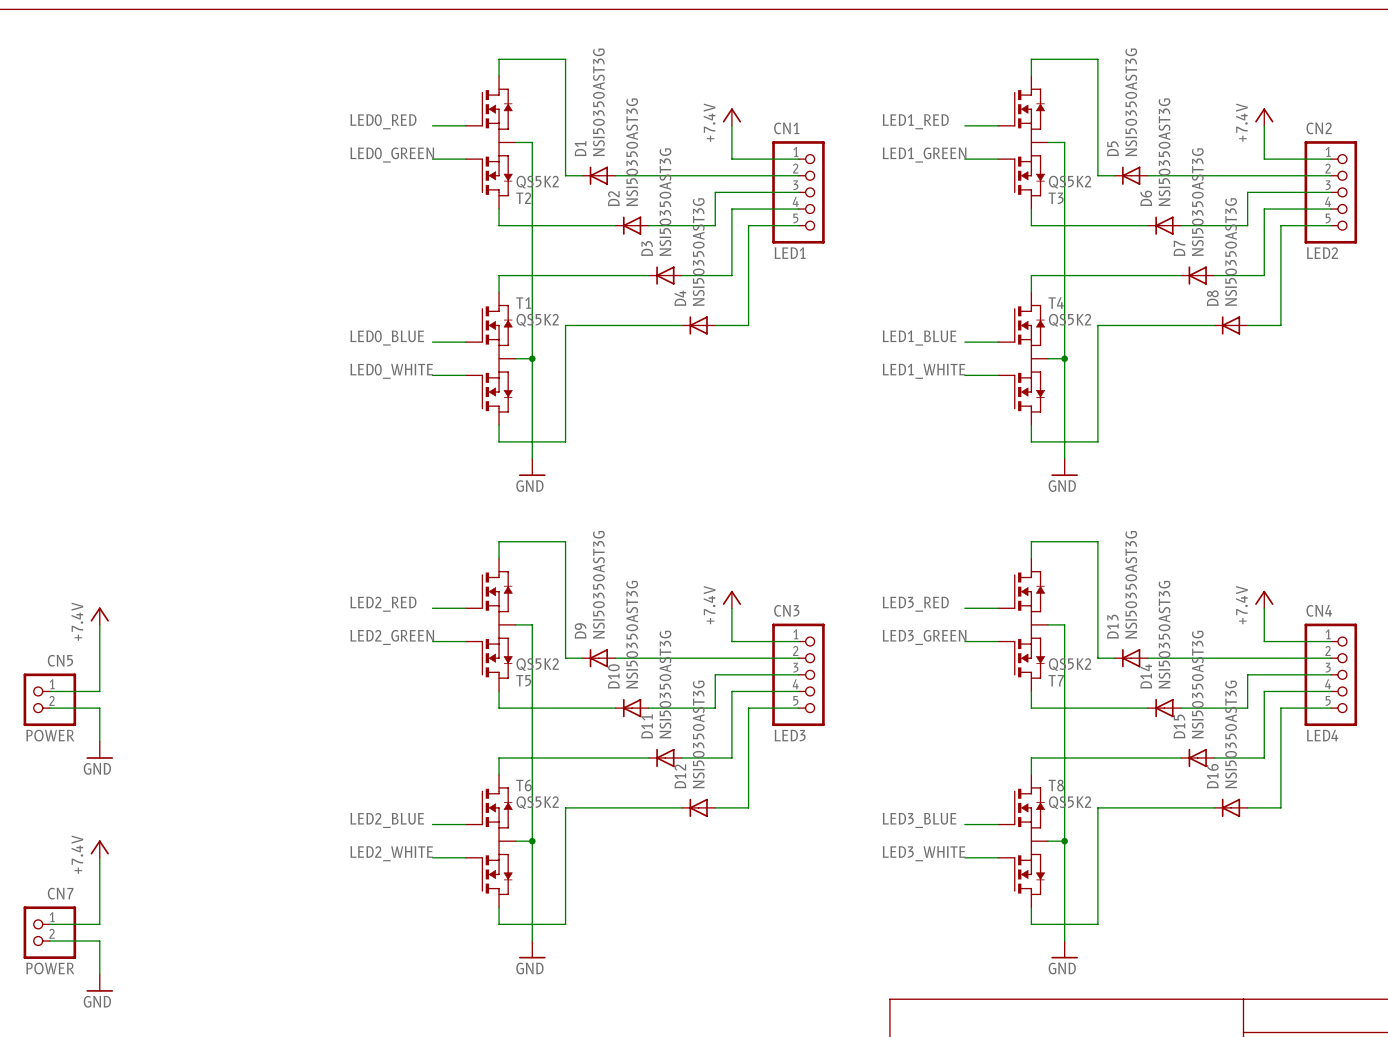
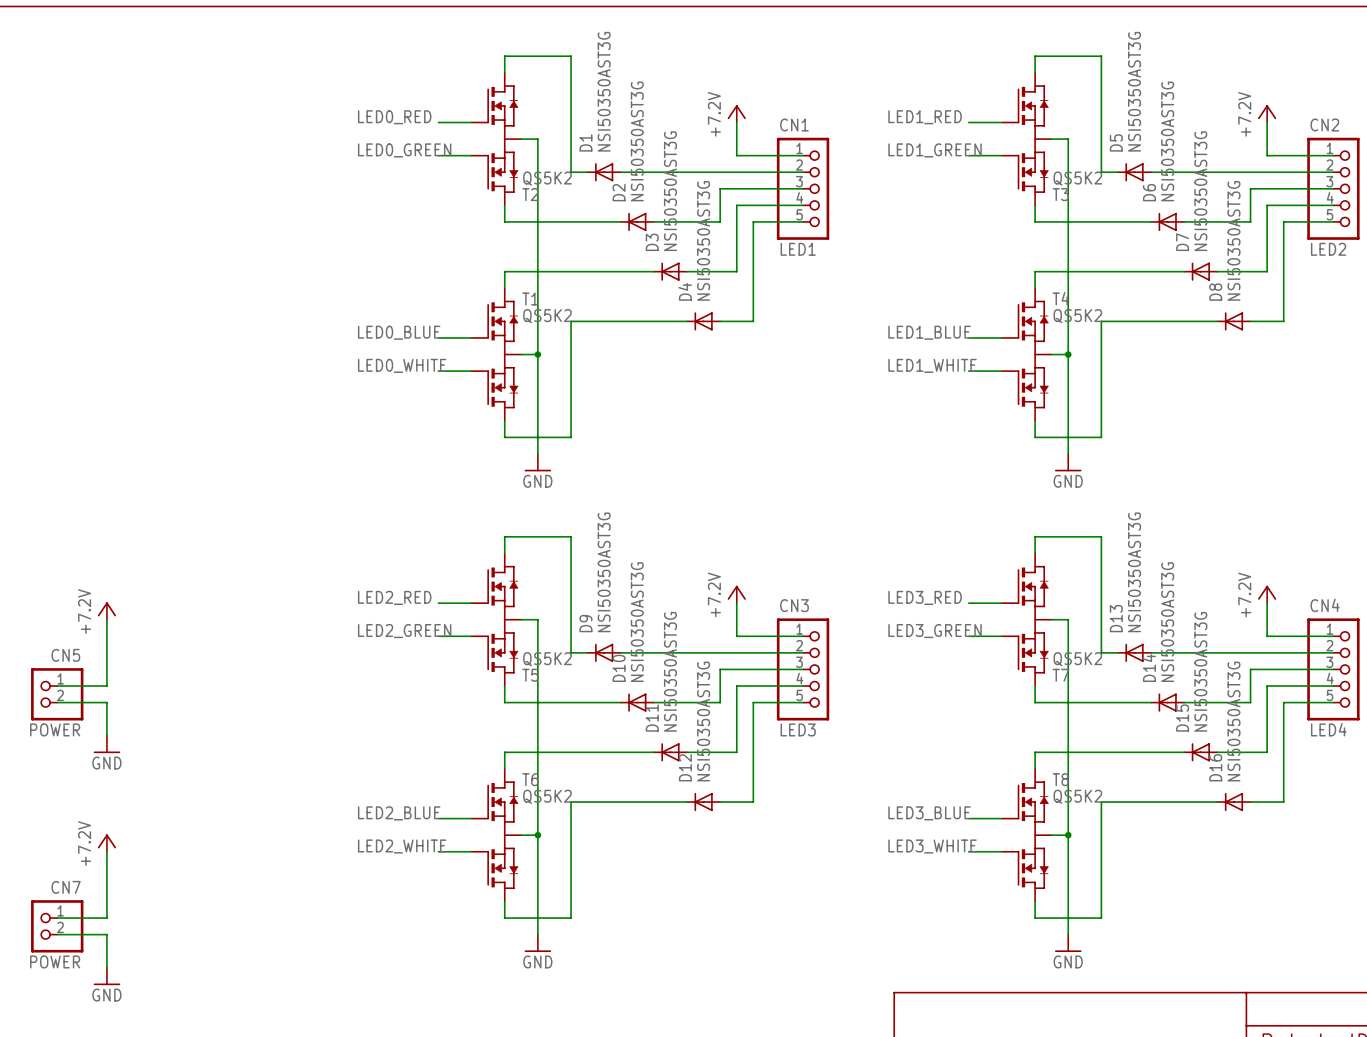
power symbol: +7.4V (731, 117) -> +7.2V (736, 113)
power symbol: +7.4V (1264, 117) -> +7.2V (1267, 113)
power symbol: +7.4V (731, 599) -> +7.2V (736, 594)
power symbol: +7.4V (1264, 599) -> +7.2V (1267, 594)
power symbol: +7.4V (99, 616) -> +7.2V (106, 611)
power symbol: +7.4V (99, 849) -> +7.2V (106, 843)

